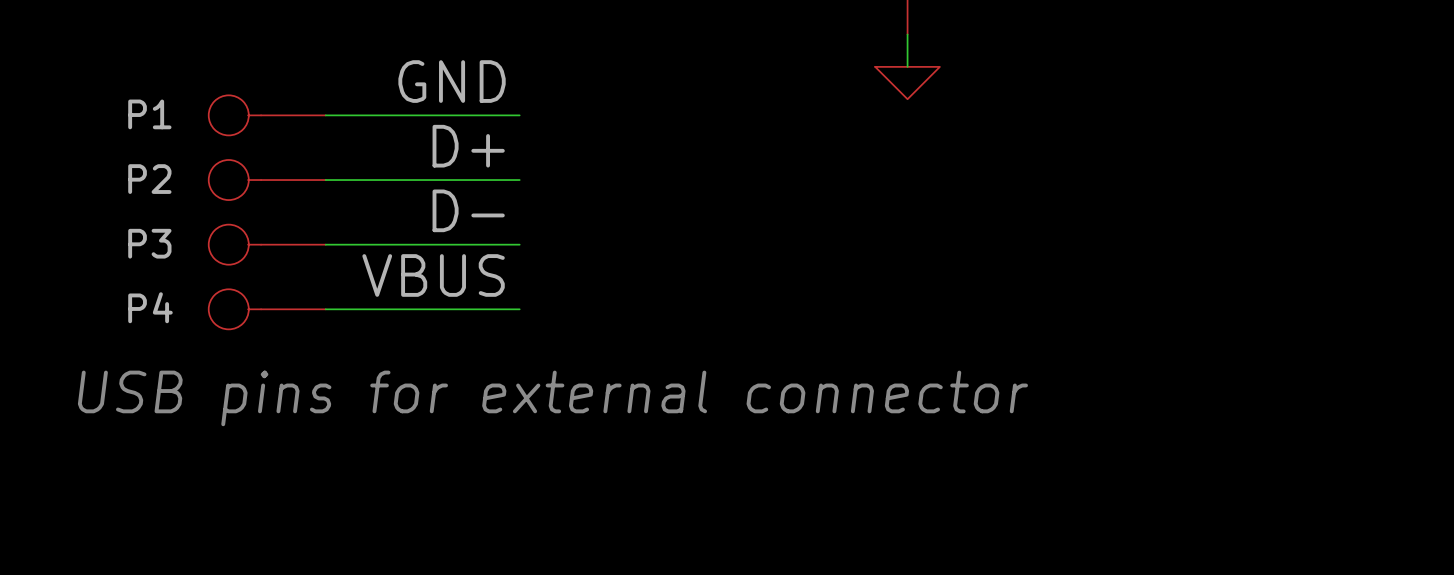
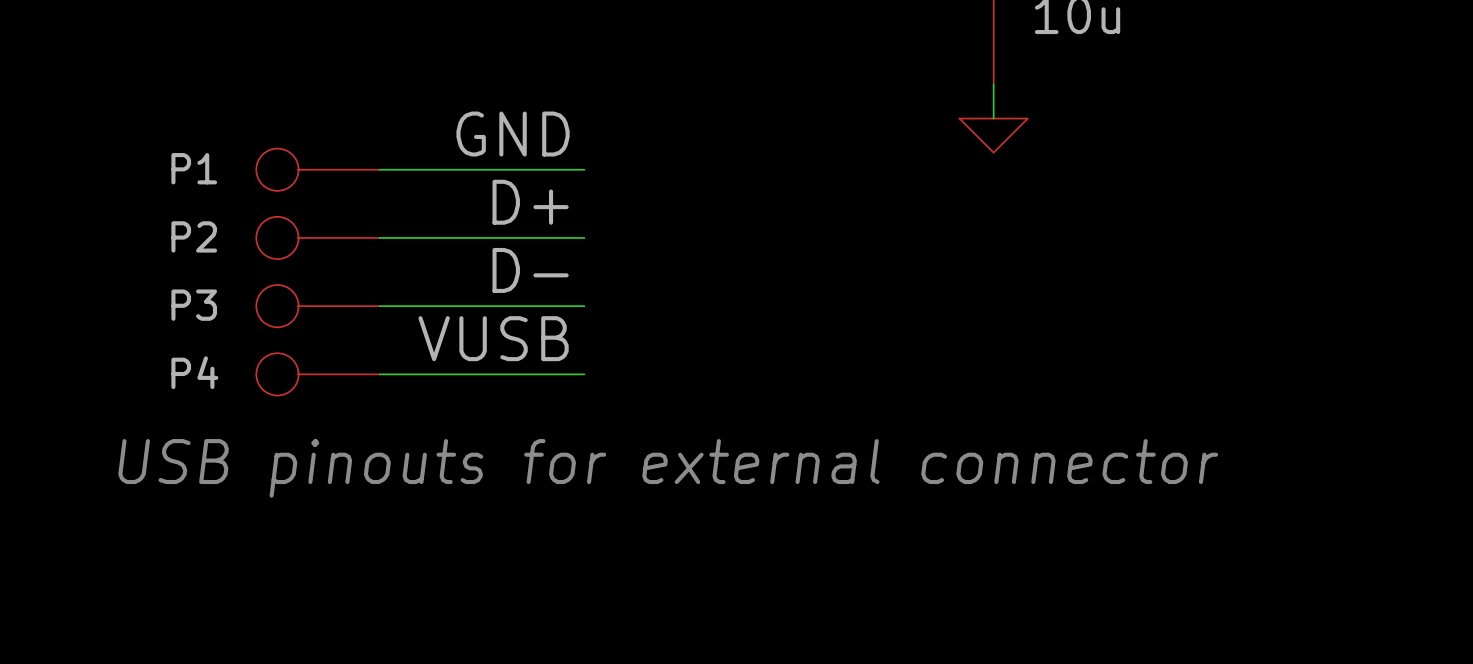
label: VBUS (433, 275) -> VUSB (493, 338)
text: USB pins for external connector (552, 398) -> USB pinouts for external connector (668, 468)

